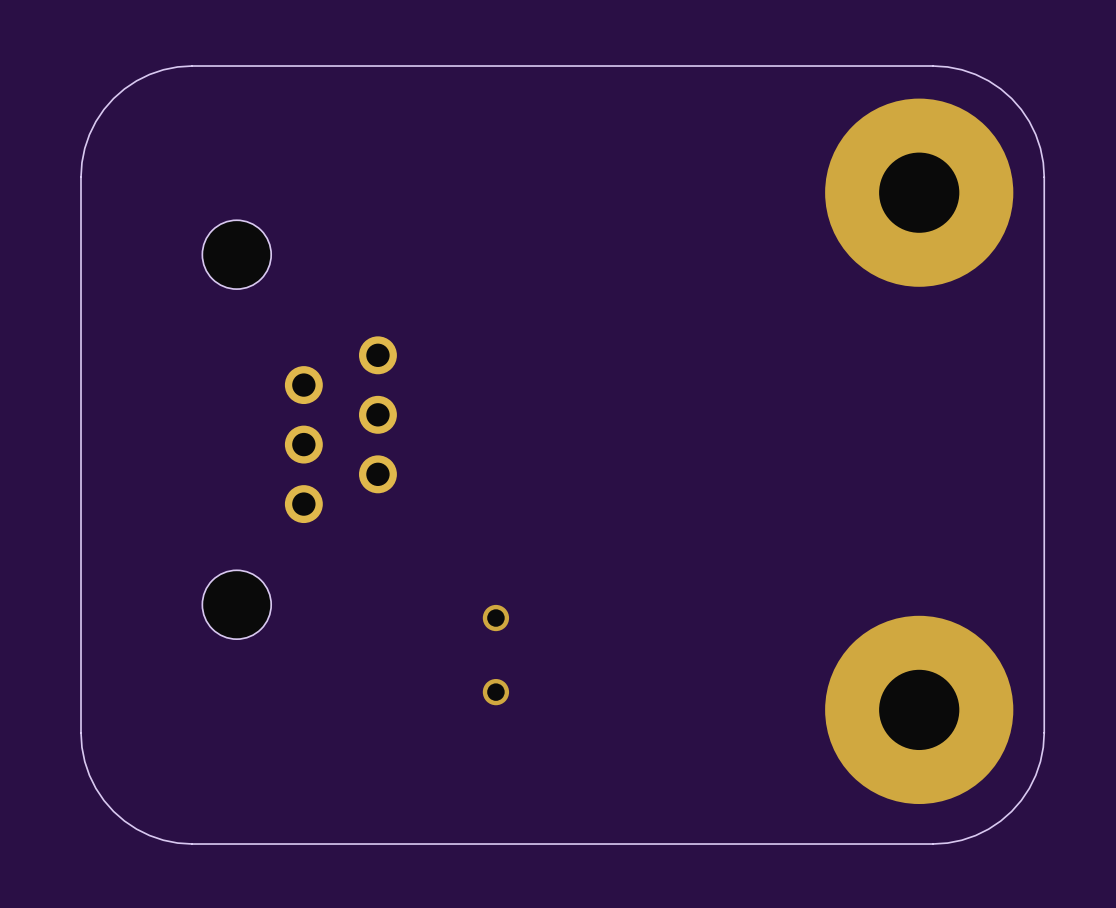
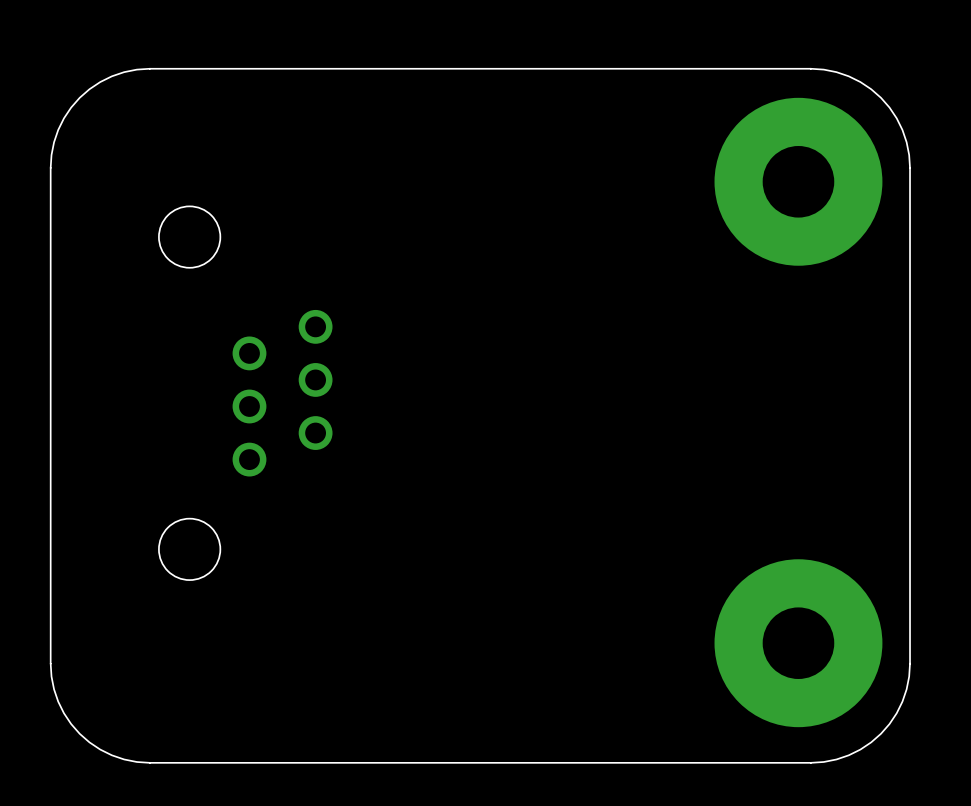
via: (495, 618) -> none
via: (495, 692) -> none

